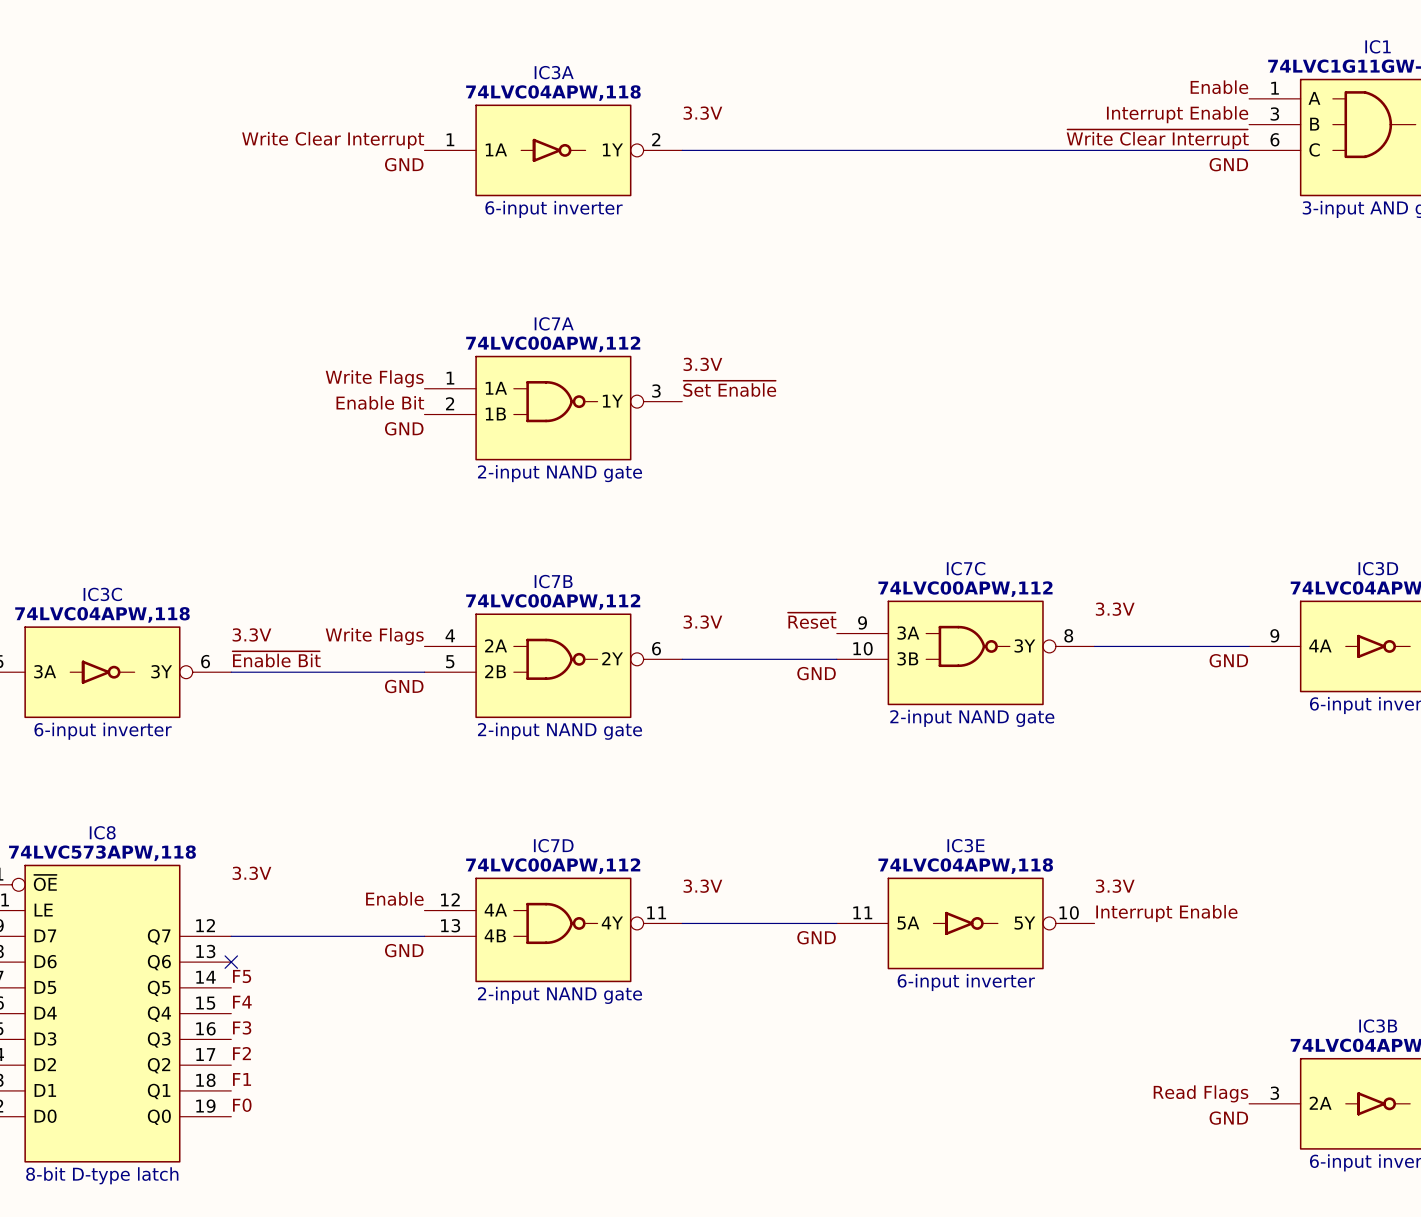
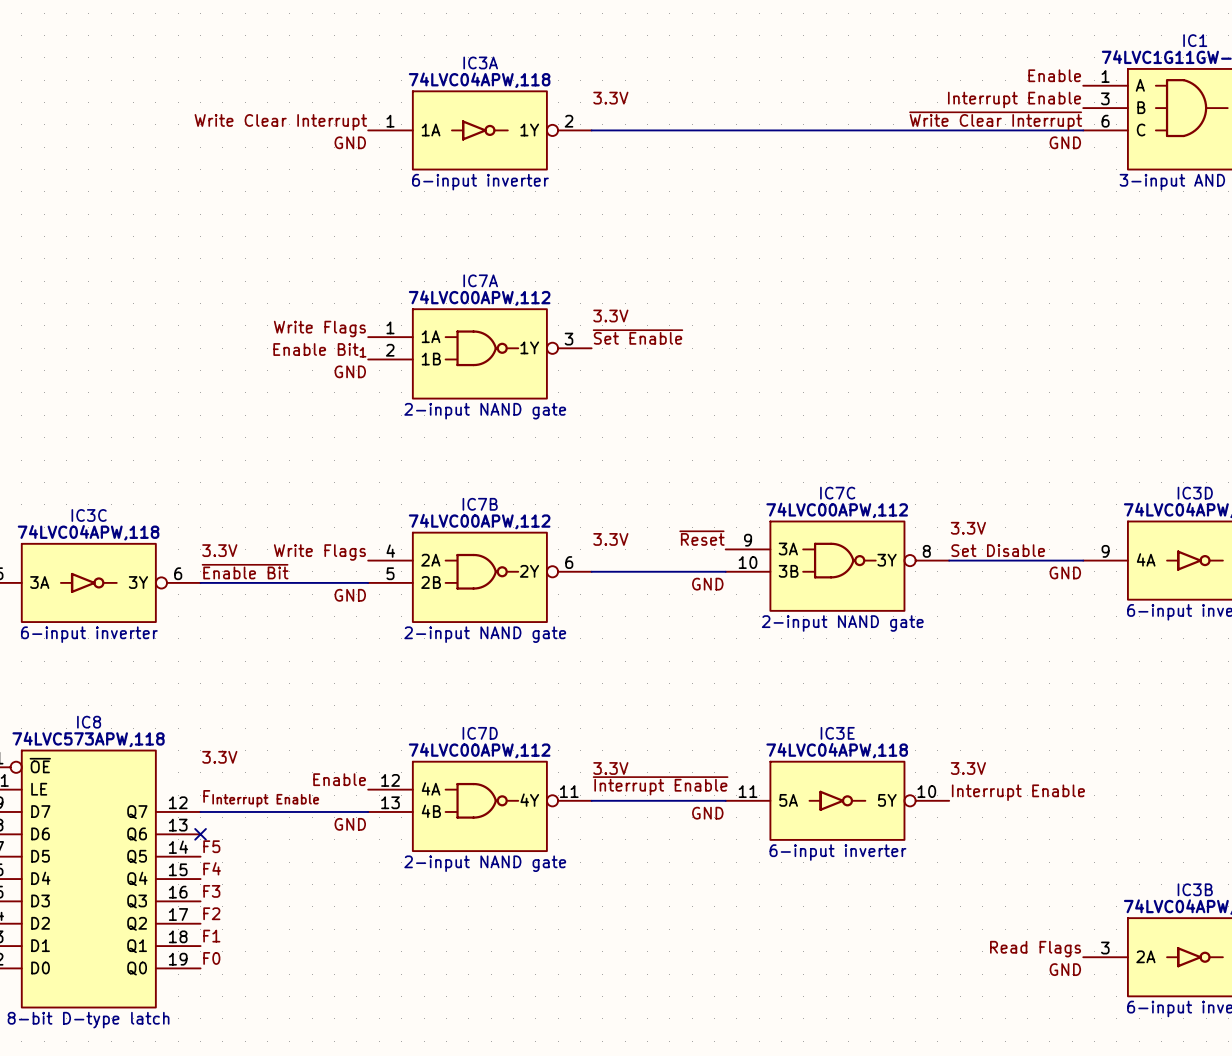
label: Enable Bit (380, 402) -> Enable Bit1 (319, 350)
label: none -> Set Disable (998, 550)
label: none -> ~{Interrupt Enable} (660, 785)
label: none -> FInterrupt Enable (261, 798)

